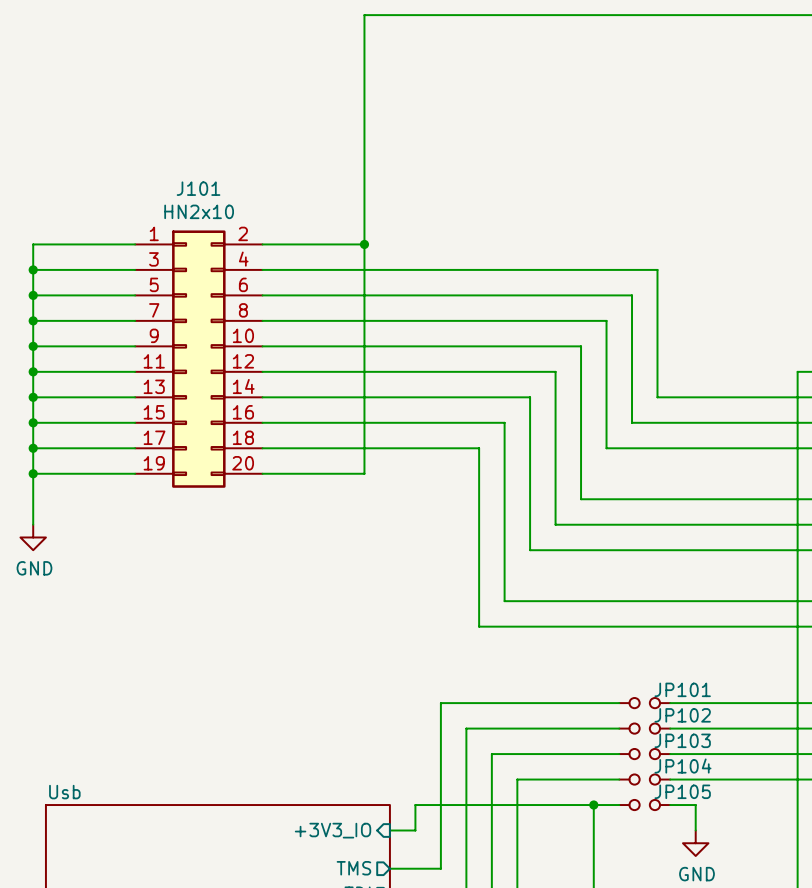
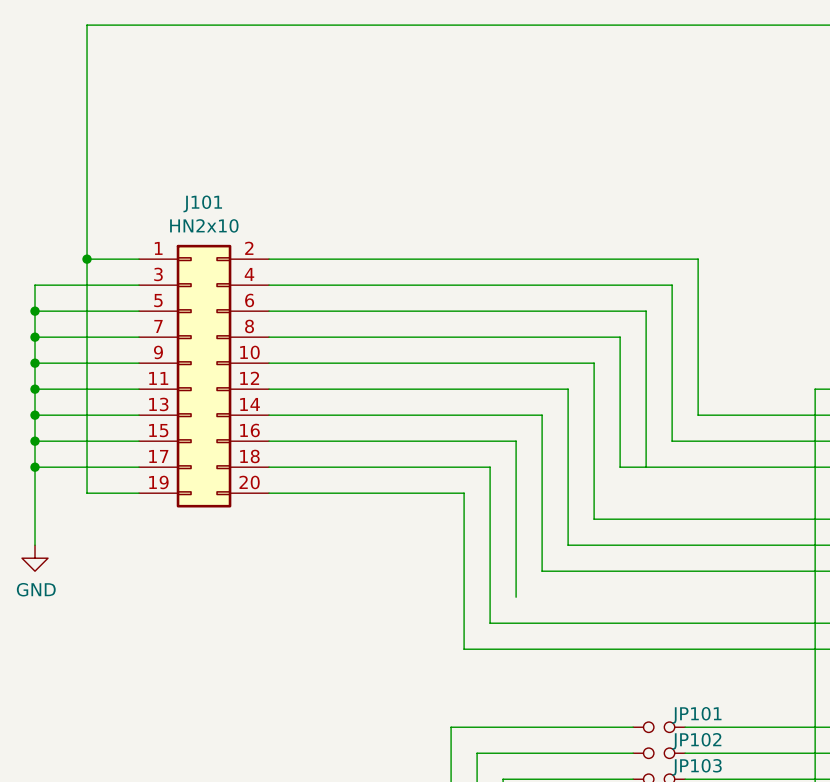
wire: (364, 15) (364, 473) -> (373, 25) (87, 25) (87, 493)
wire: (84, 244) (33, 244) (33, 269) -> none
wire: none -> (373, 259) (698, 259) (698, 415)
junction: (364, 244) -> none
junction position: (33, 269) -> (87, 259)
wire: (657, 397) (682, 397) -> (672, 415) (672, 441)
wire: (632, 422) (657, 422) -> (646, 441) (646, 467)
wire: (33, 473) (84, 473) -> none
junction: (33, 473) -> none
wire: (504, 575) (504, 601) -> (490, 623) (516, 623)
wire: (479, 601) (479, 626) -> (373, 493) (464, 493) (464, 649) (490, 649)

